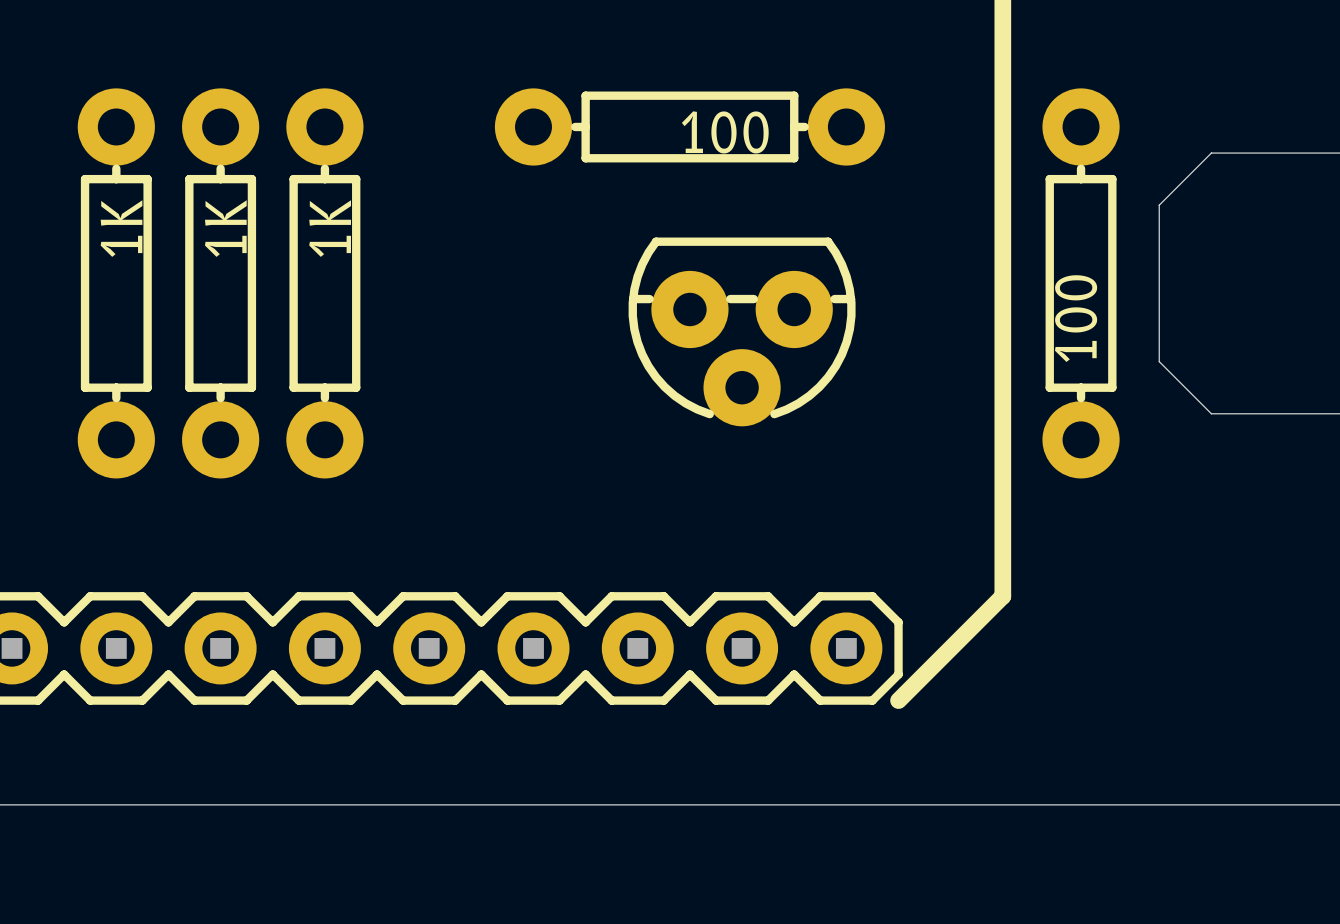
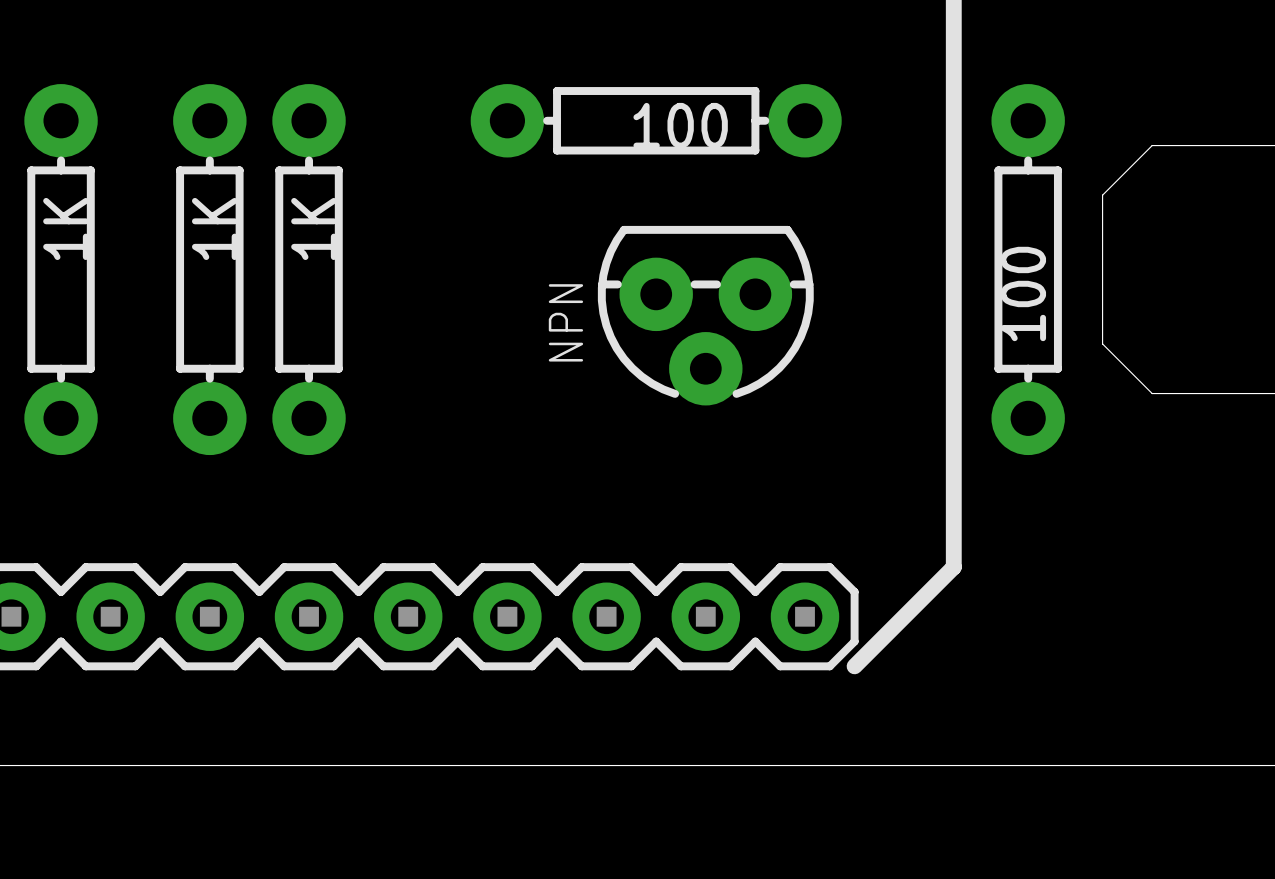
part position: (116, 283) -> (61, 269)
text: none -> NPN (565, 322)

